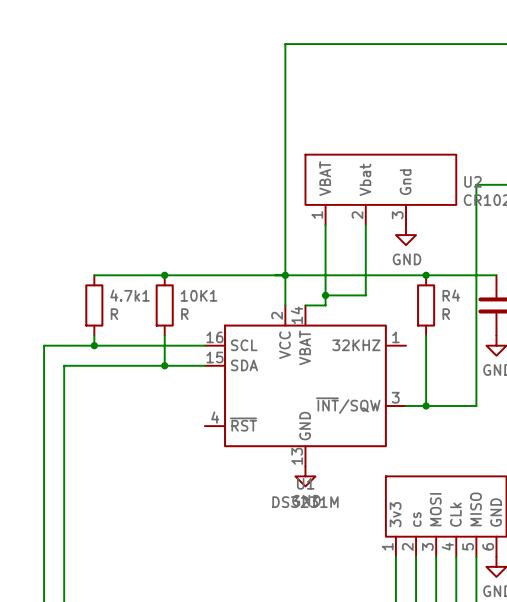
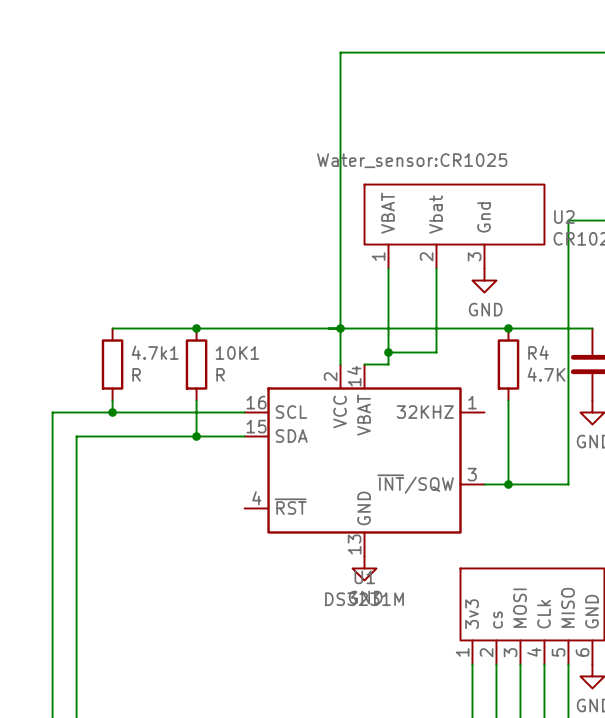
U2 text: none -> Water_sensor:CR1025 (412, 160)
R4 value: R (446, 314) -> 4.7K (546, 374)

